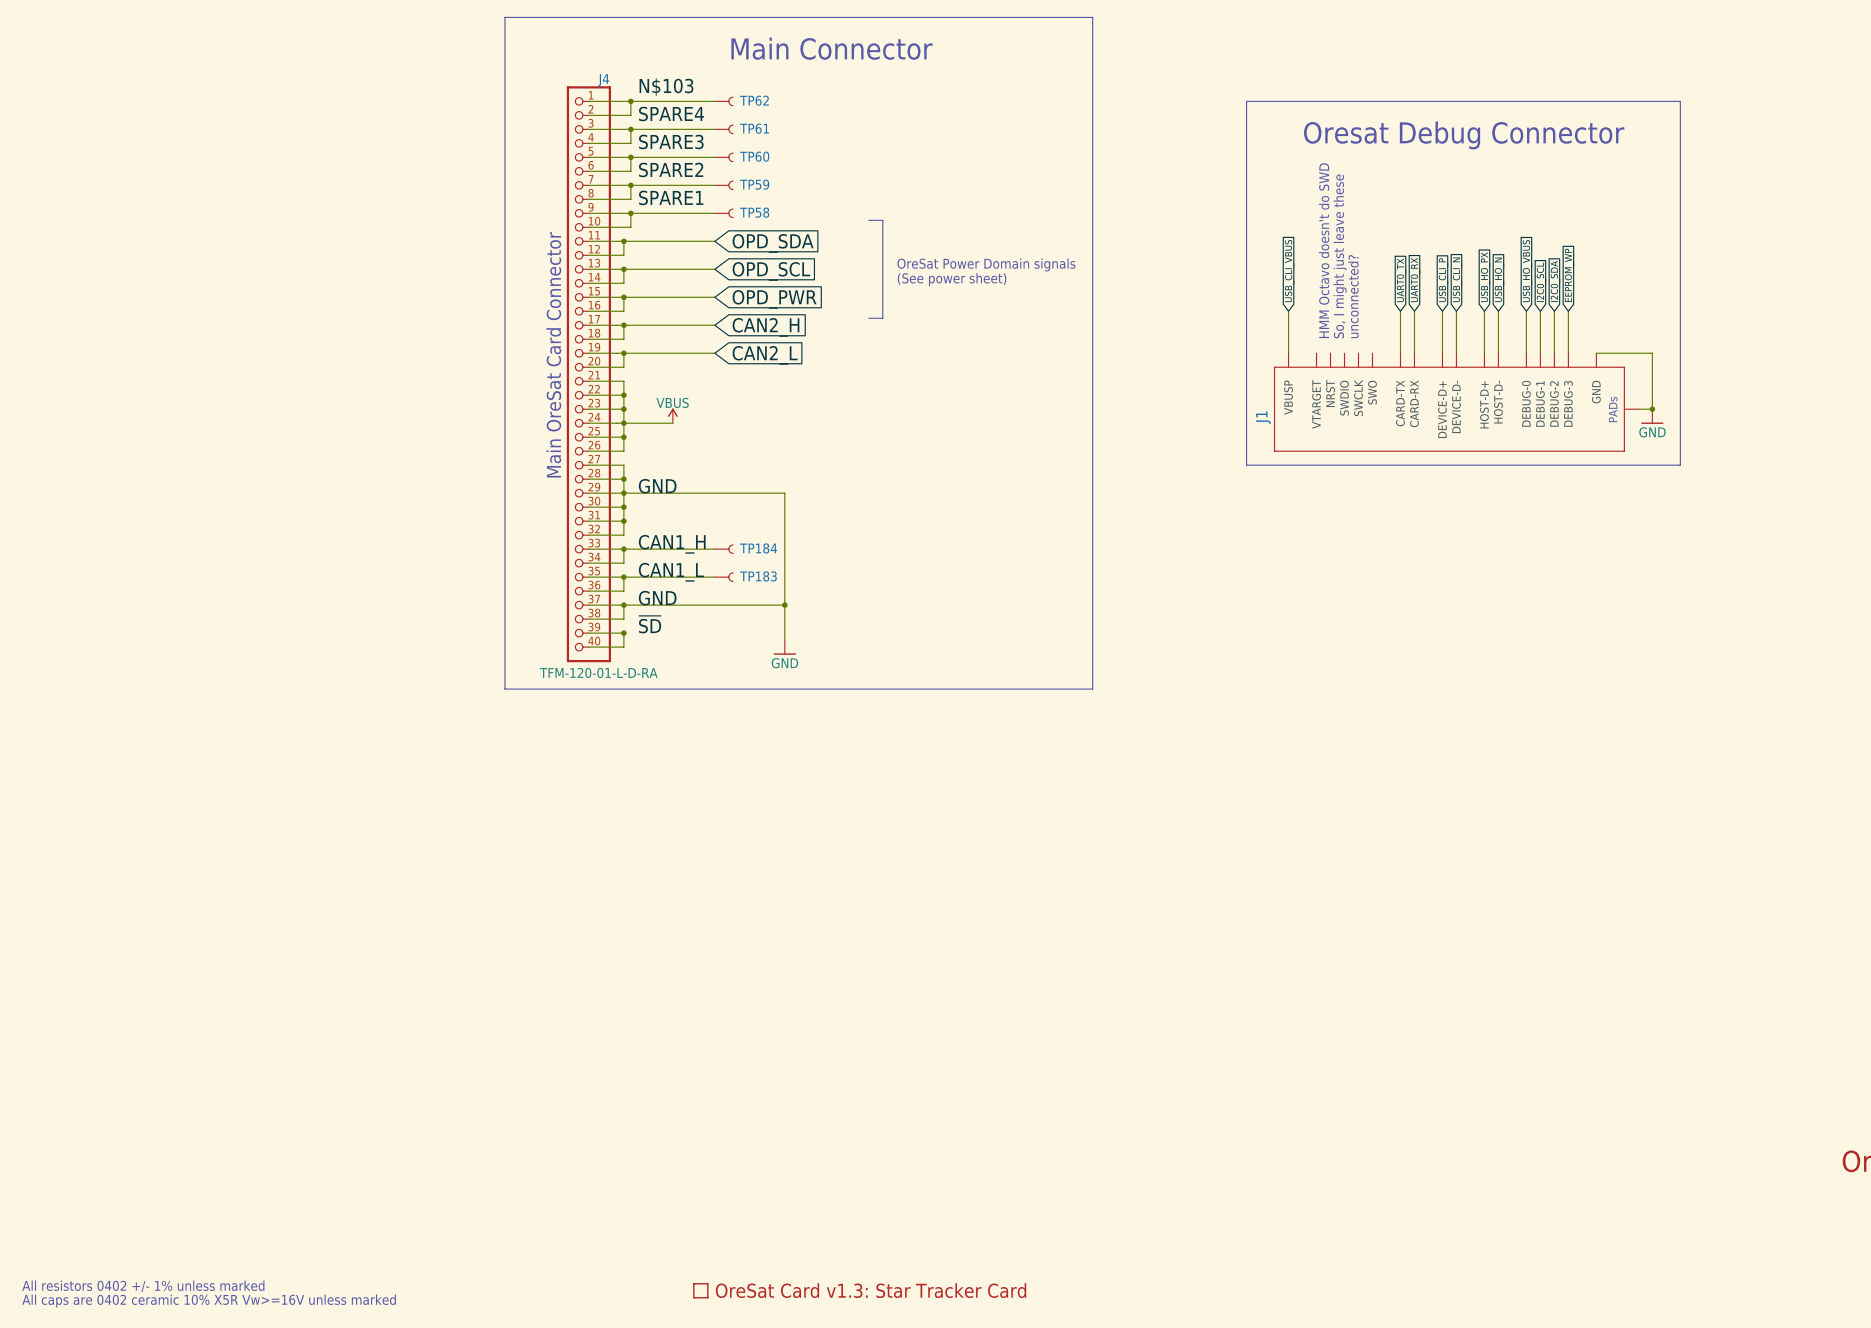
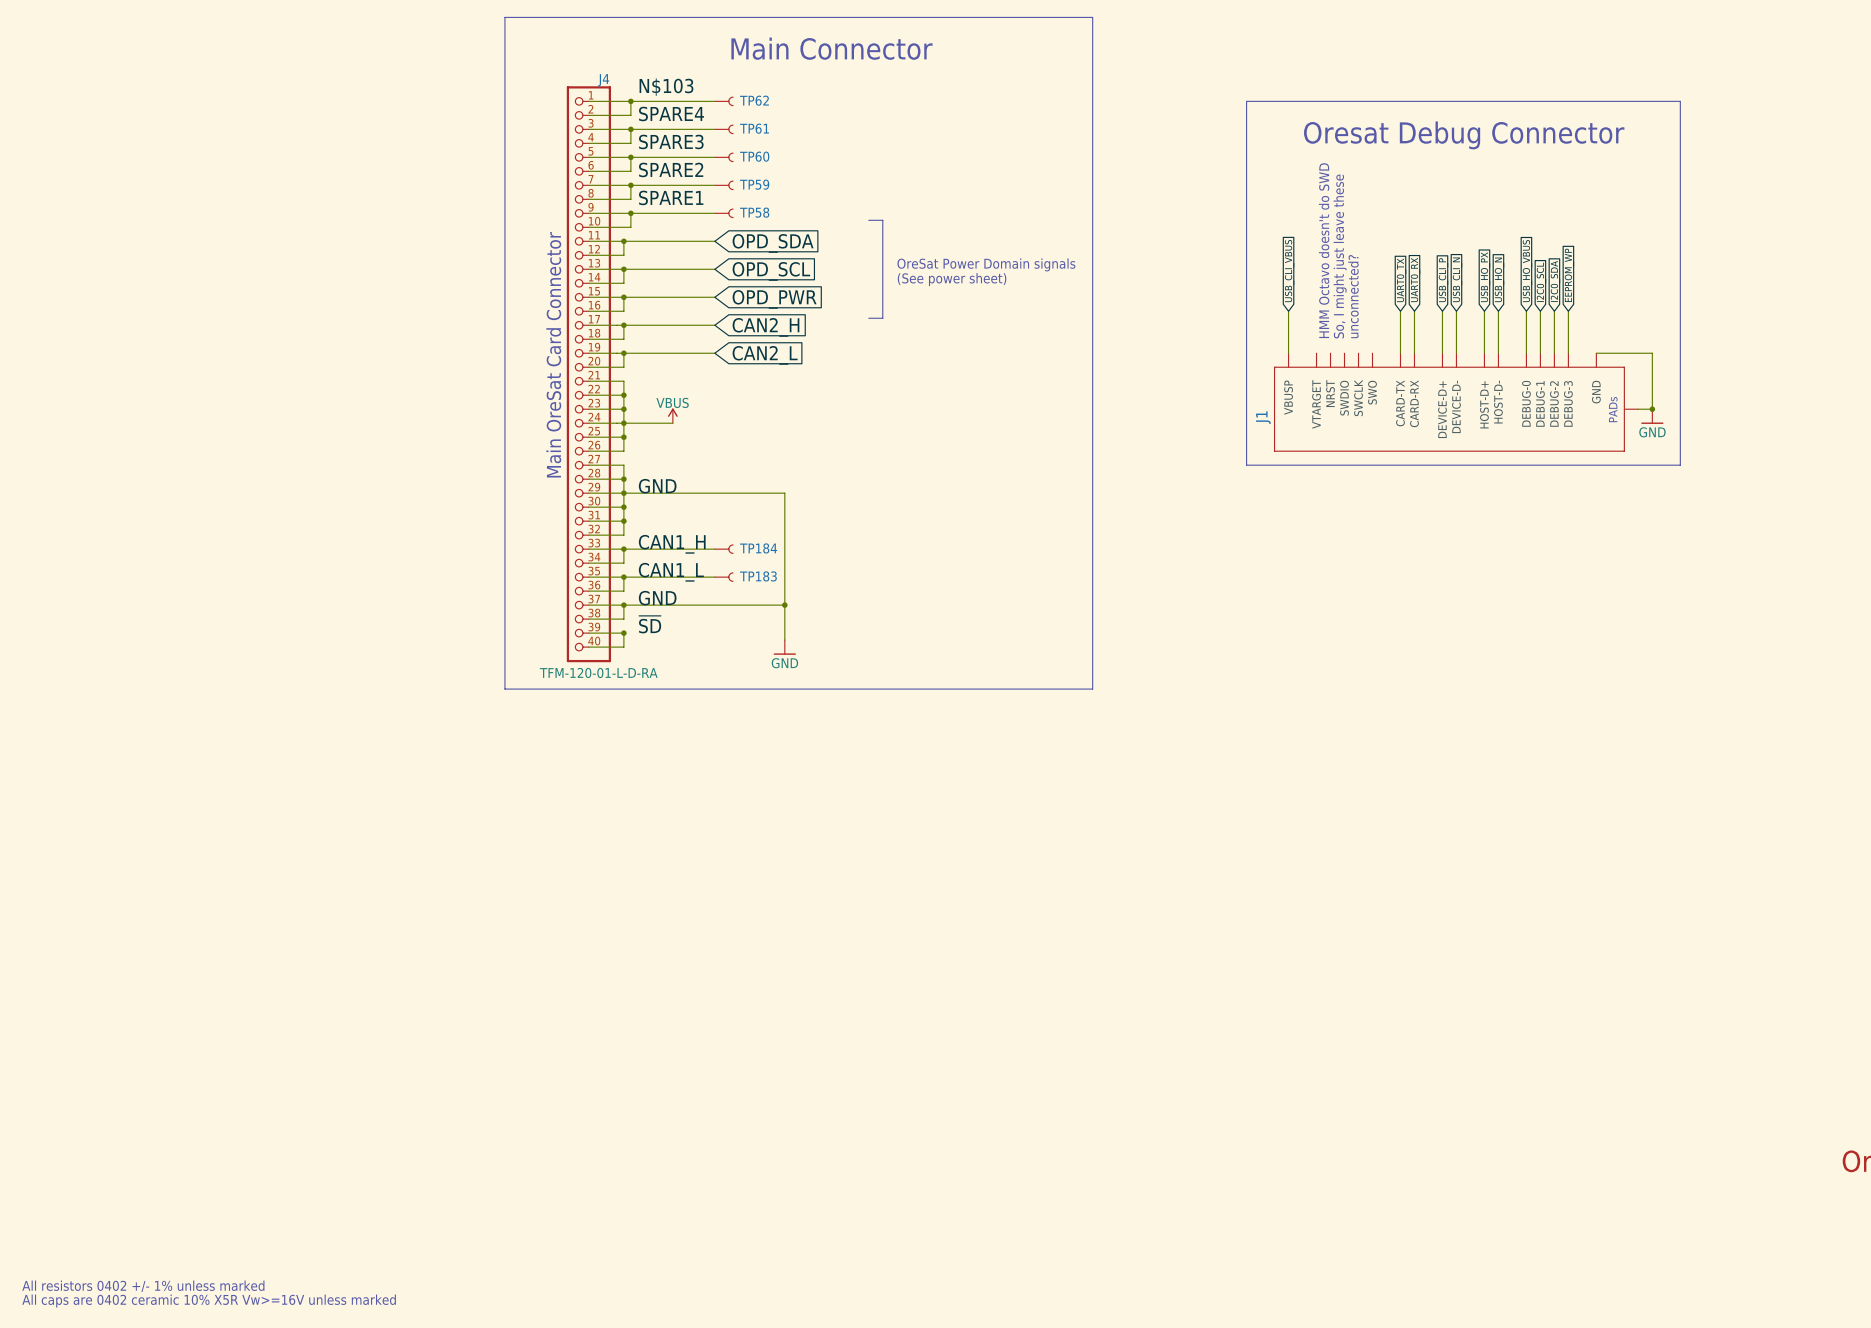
part: (700, 1290) -> none

